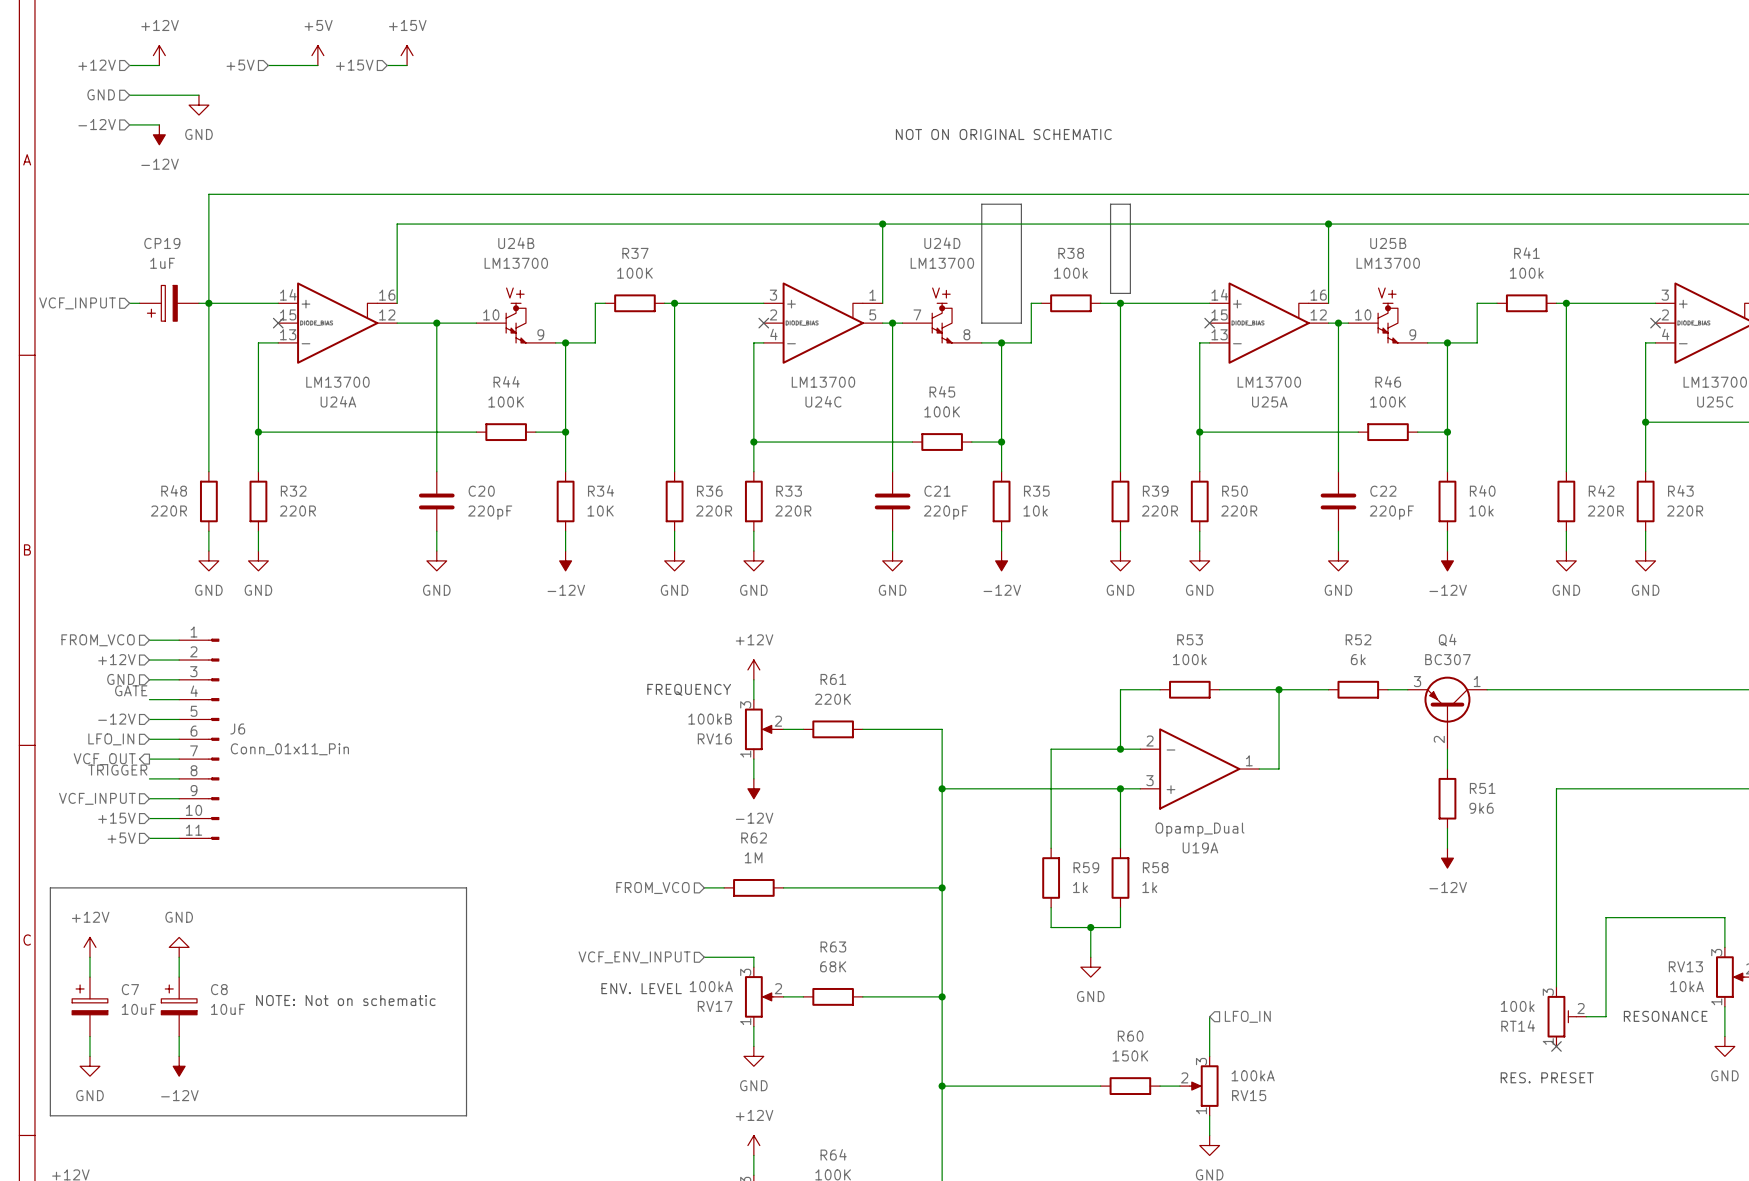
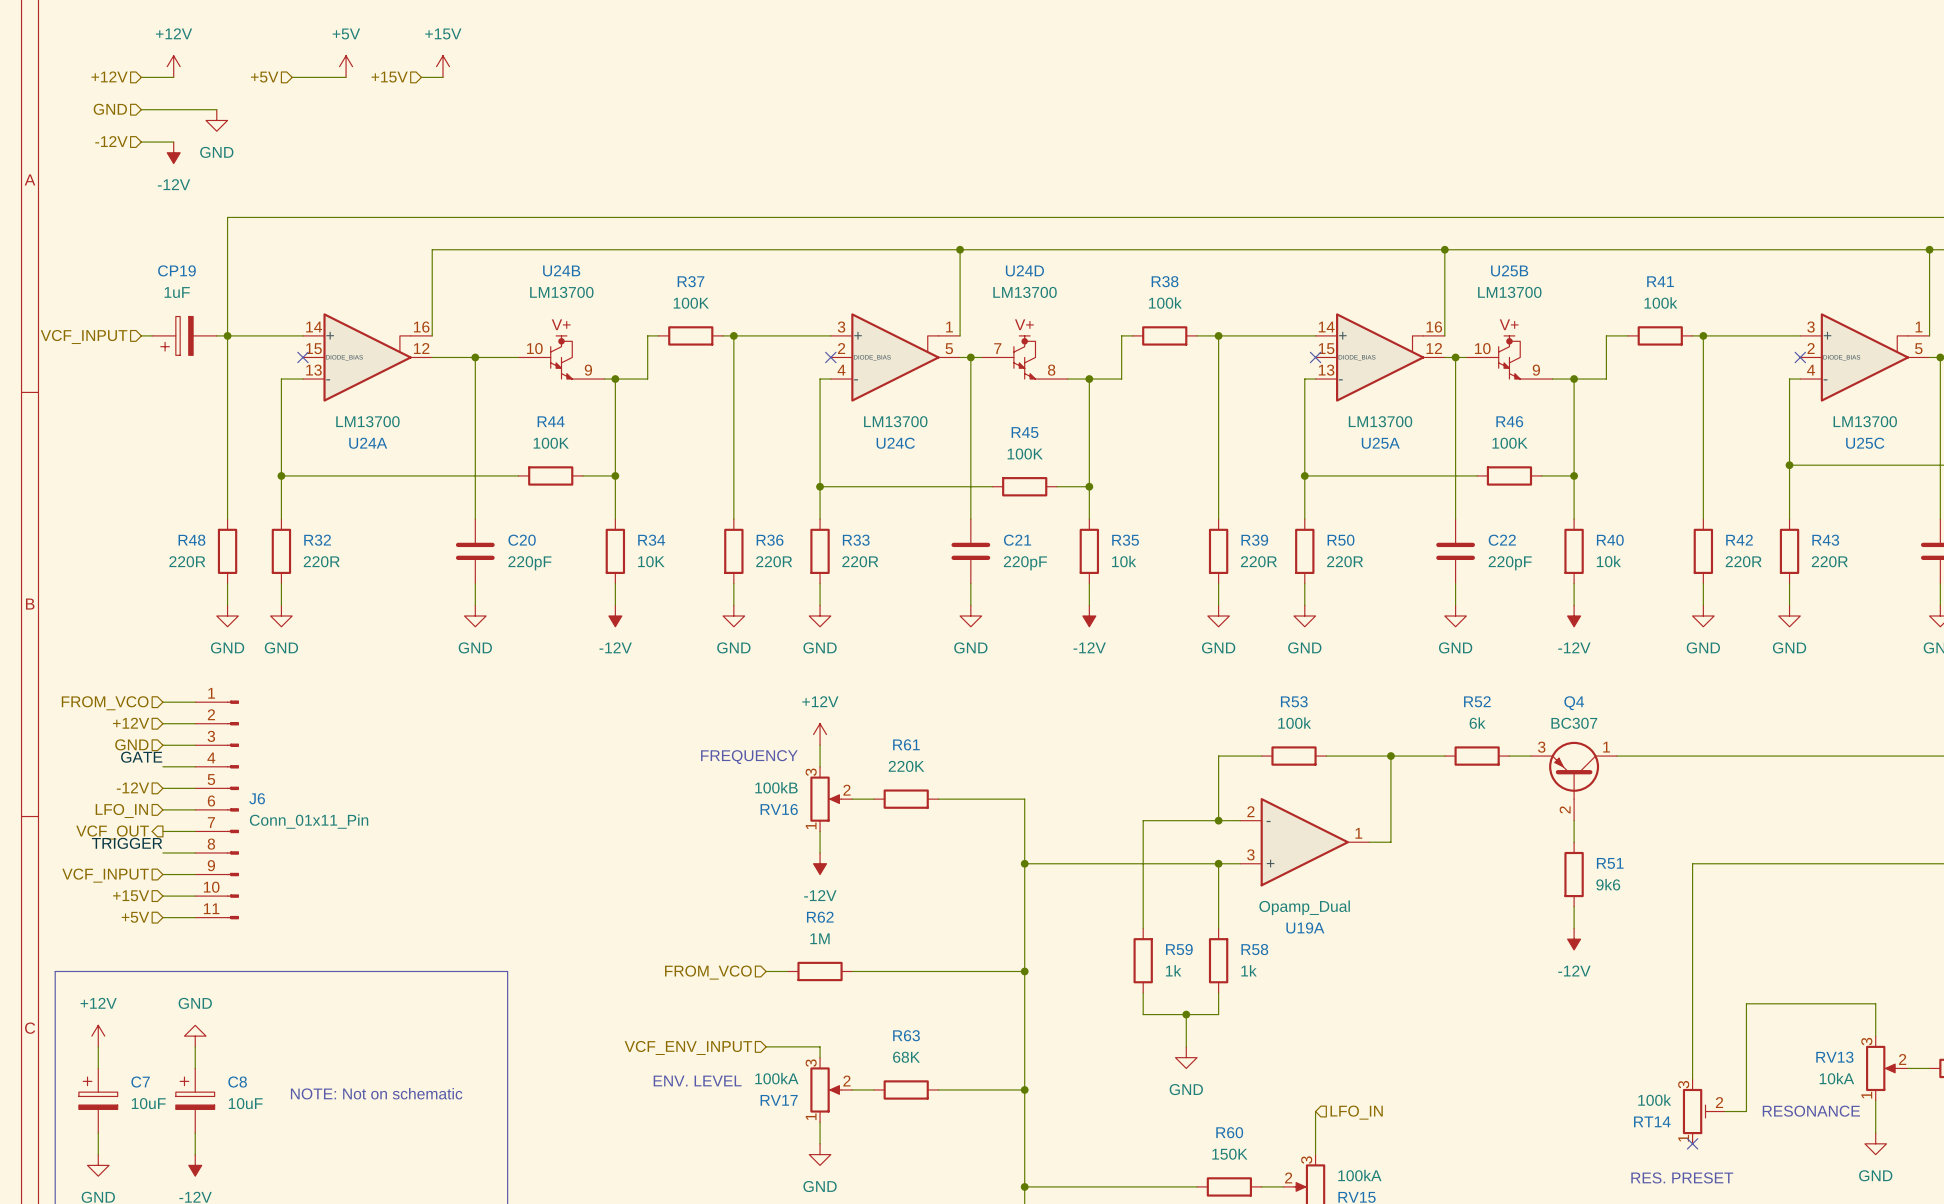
text: NOT ON ORIGINAL SCHEMATIC (1003, 134) -> none
line: (981, 204) (1021, 204) (1021, 323) (981, 323) (981, 204) -> none
line: (1110, 204) (1130, 204) (1130, 293) (1110, 293) (1110, 204) -> none

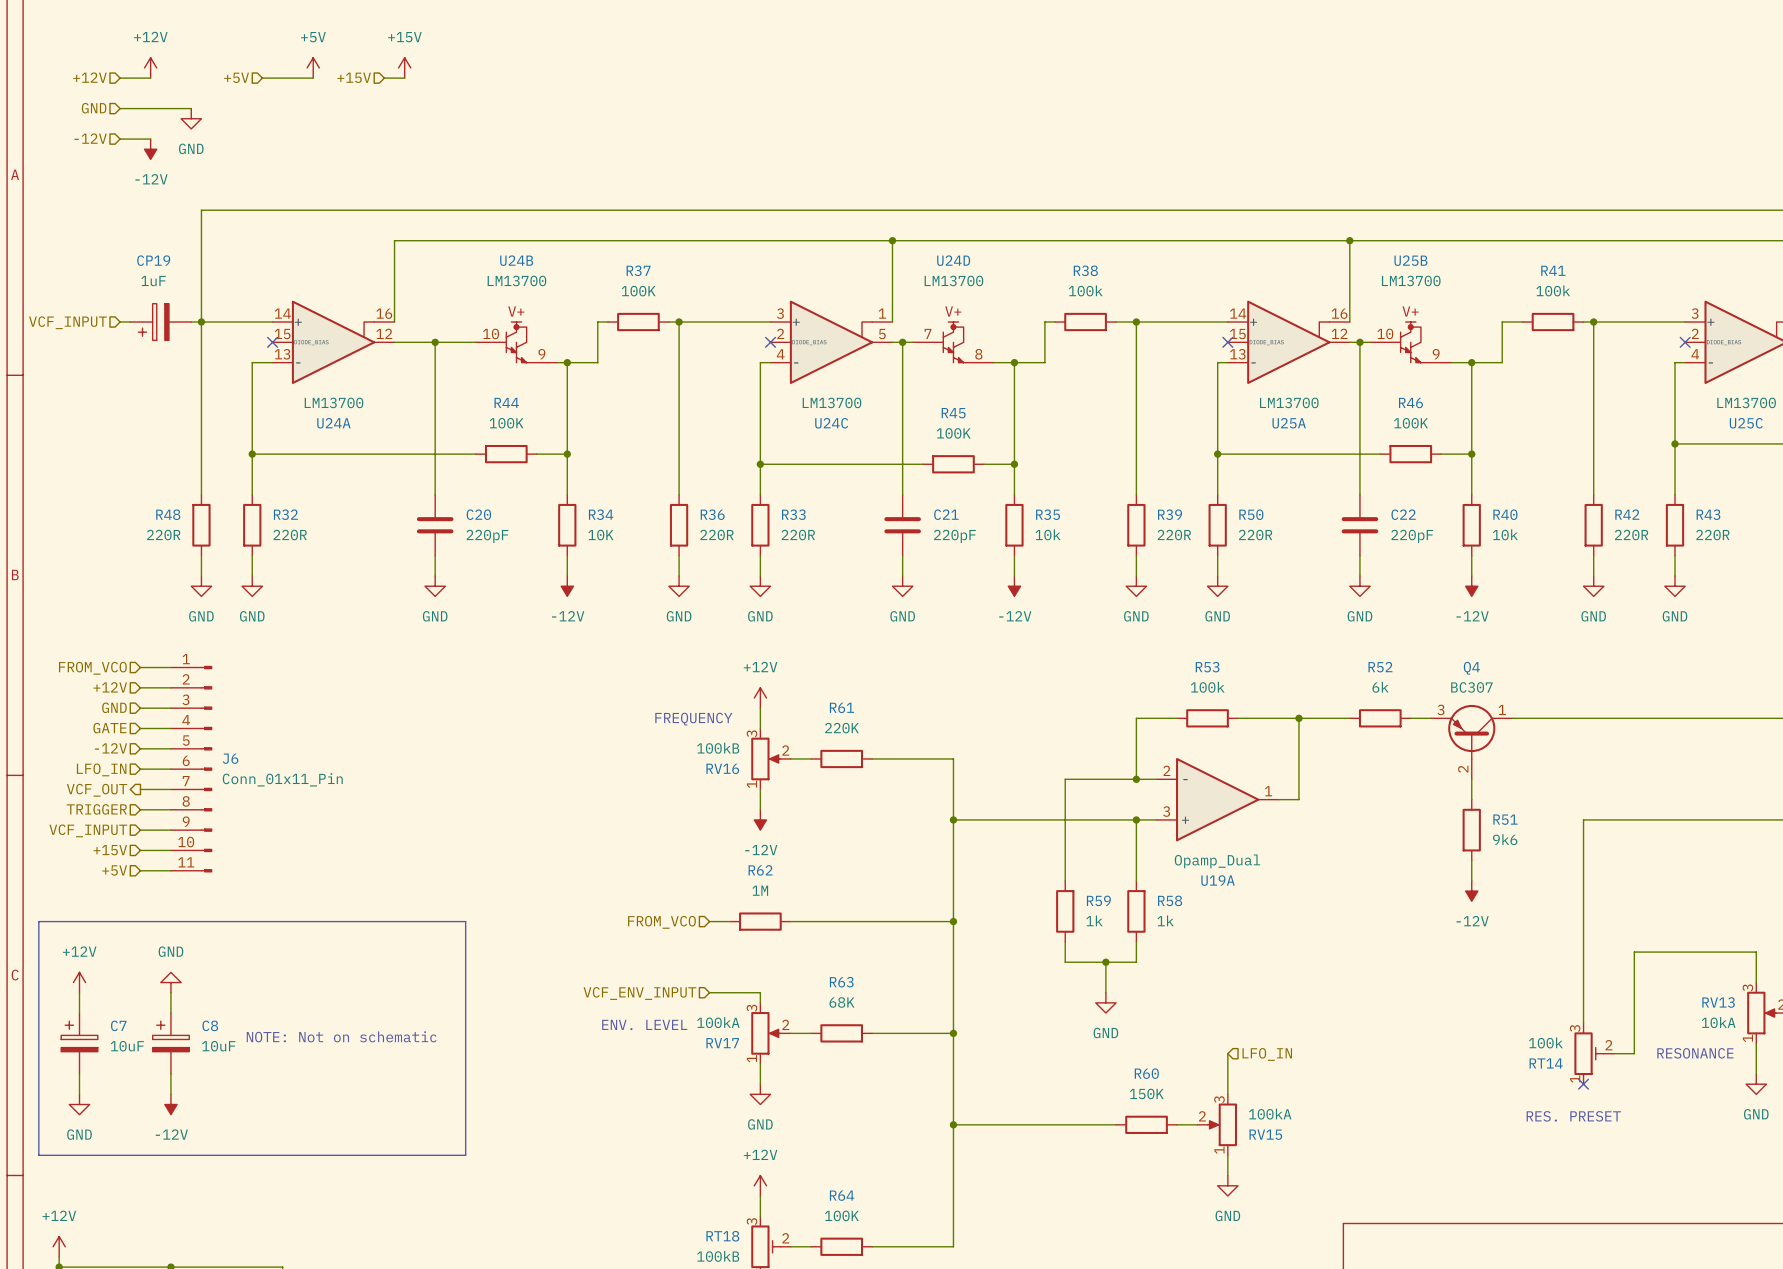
label: GATE (141, 757) -> none
hierarchical label: none -> GATE (109, 728)
label: TRIGGER (127, 843) -> none
hierarchical label: none -> TRIGGER (96, 809)

